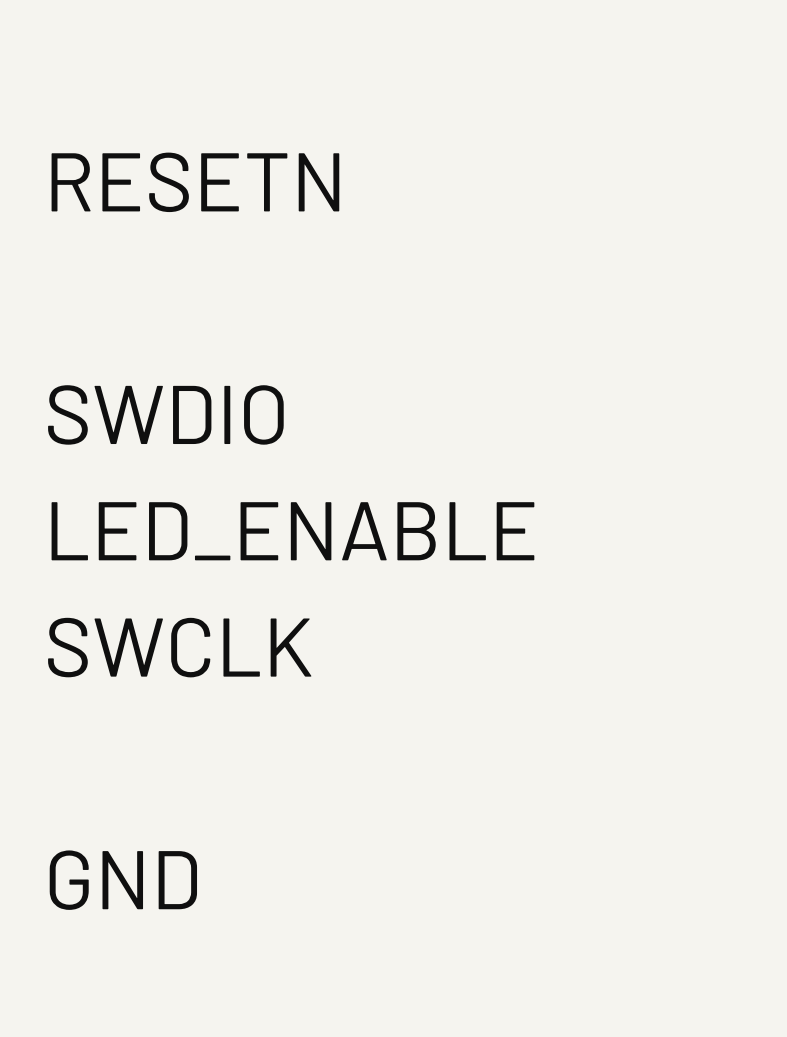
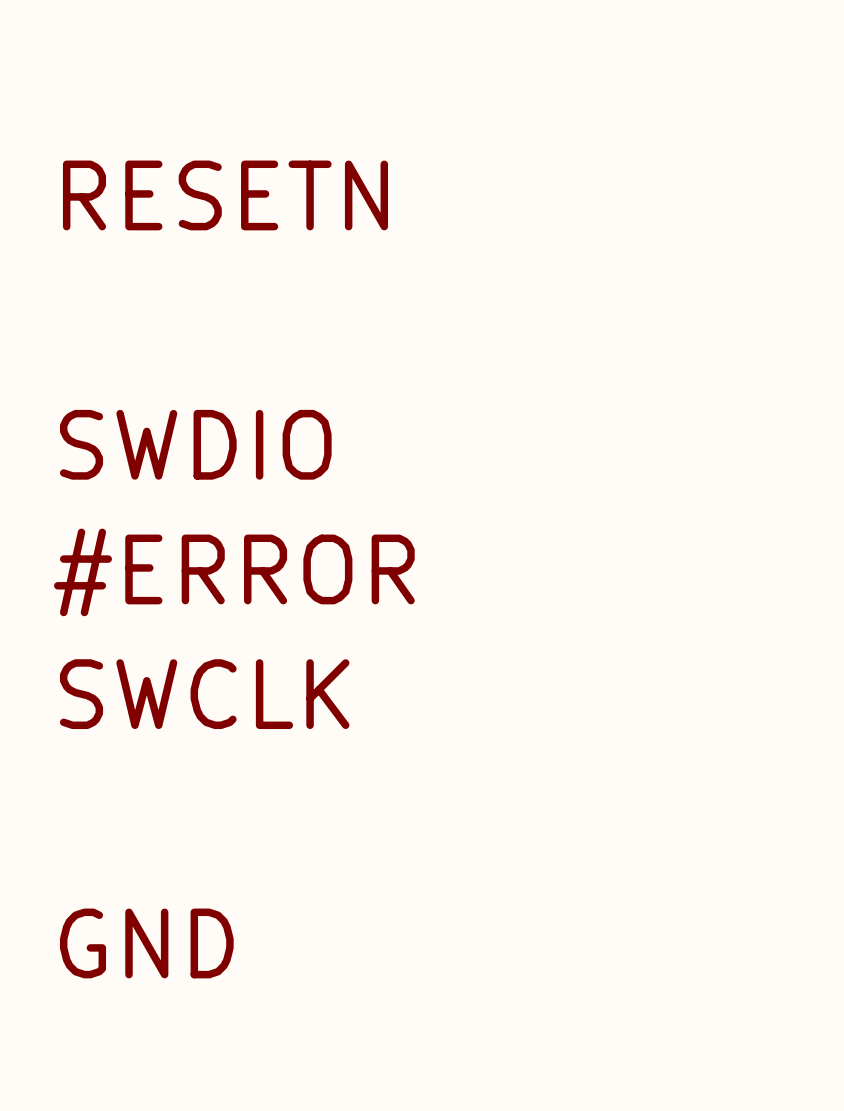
label: LED_ENABLE (292, 531) -> #ERROR (234, 572)

